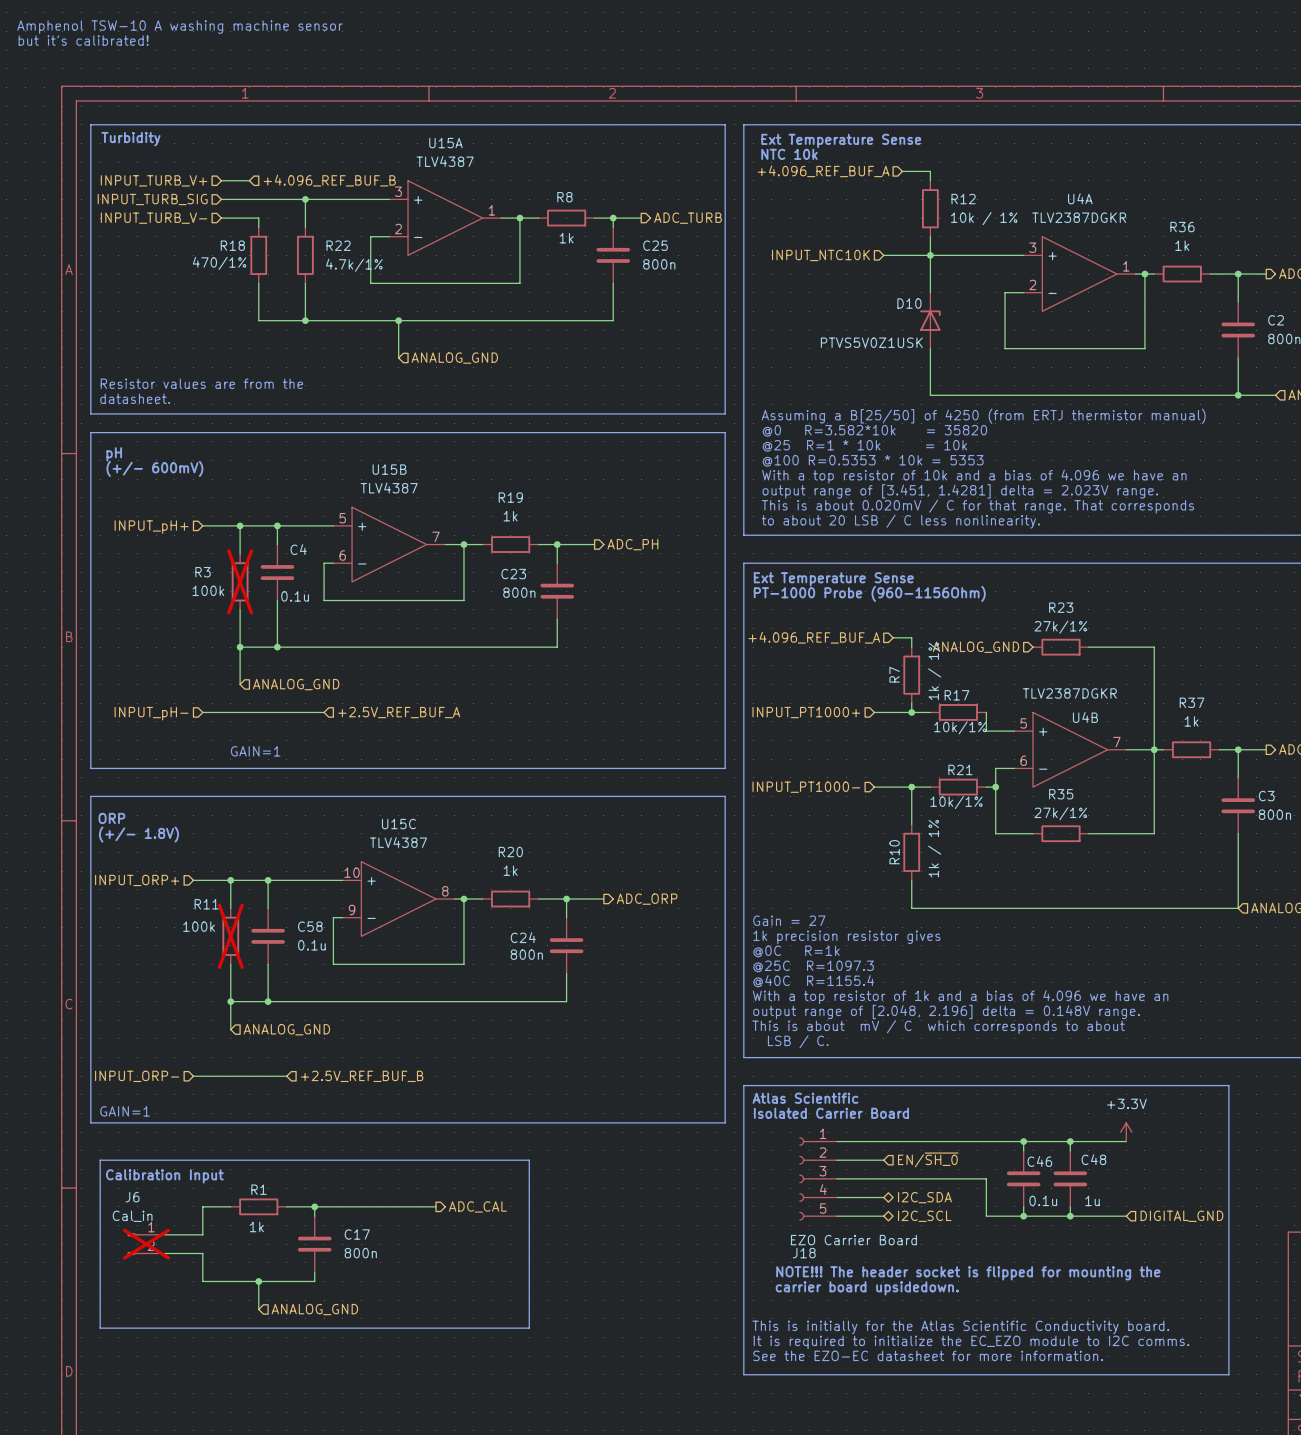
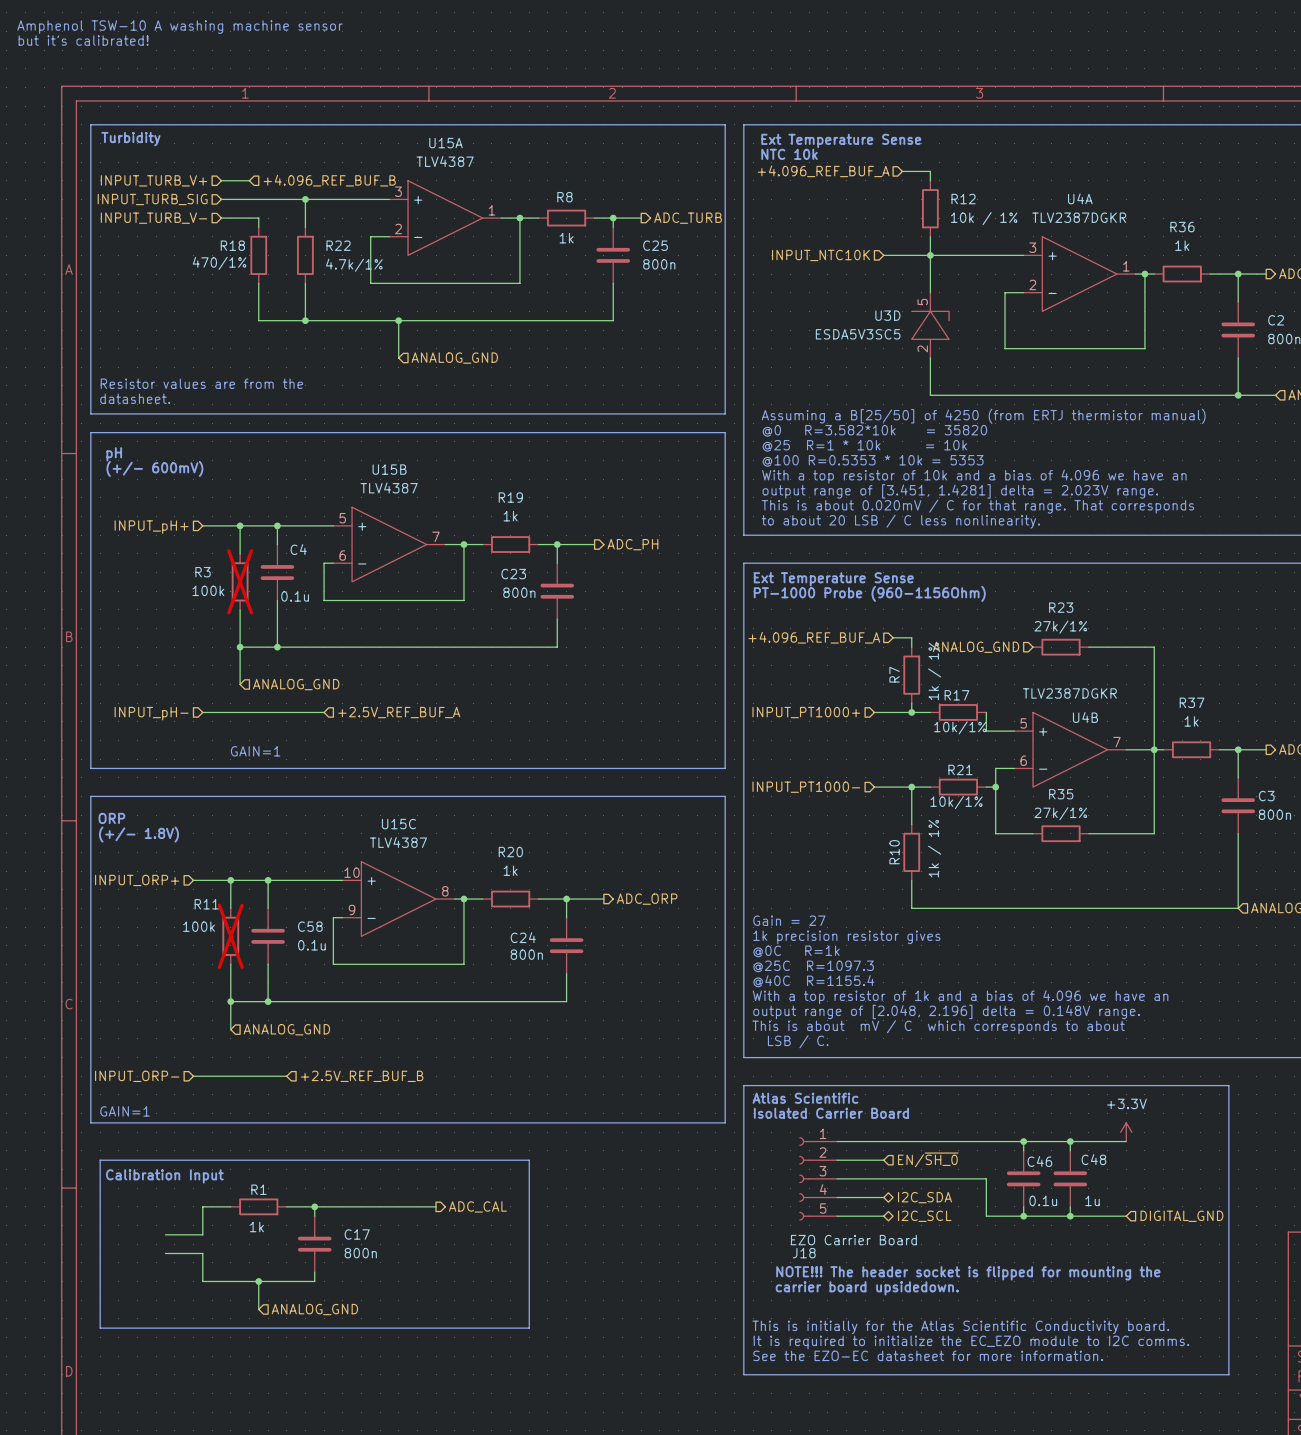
D10: PTVS5V0Z1USK (930, 320) -> none
U3D: none -> ESDA5V3SC5 (930, 325)
J6: Cal_in (146, 1244) -> none

